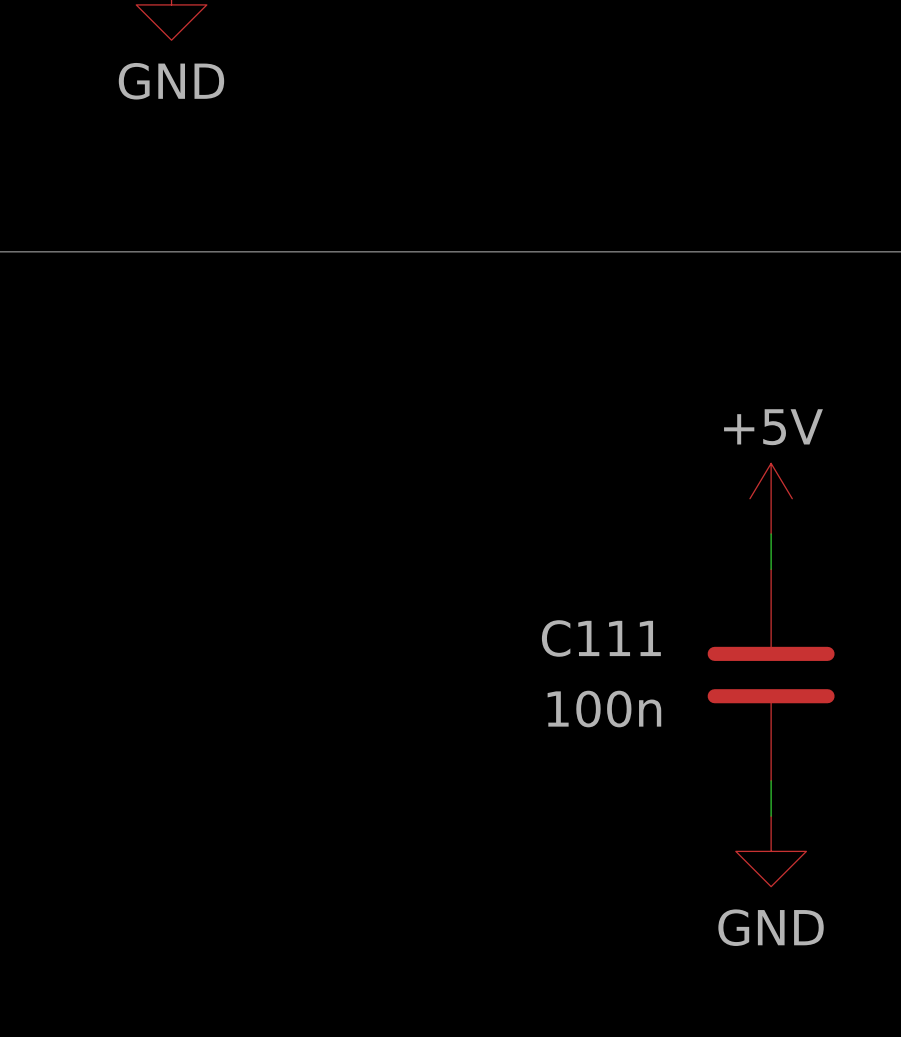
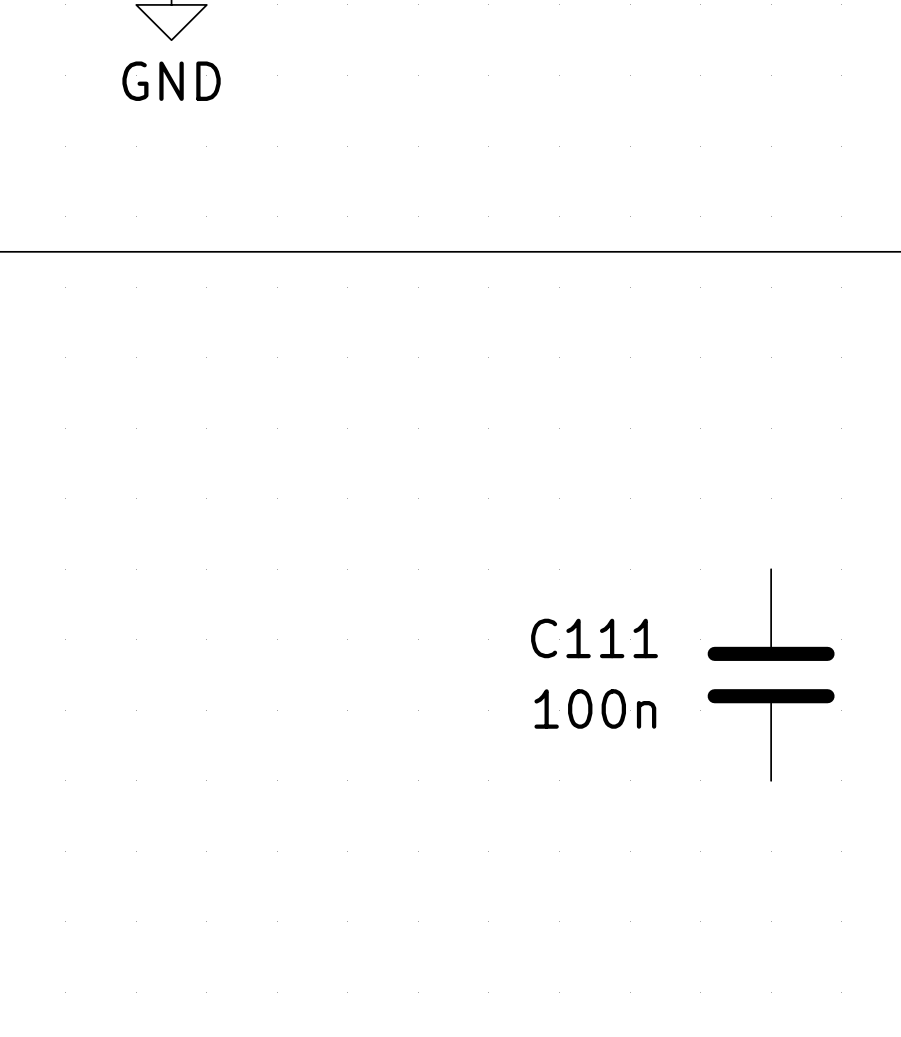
power symbol: +5V (771, 498) -> none
wire: (771, 533) (771, 569) -> none
wire: (771, 780) (771, 816) -> none
power symbol: GND (771, 851) -> none

